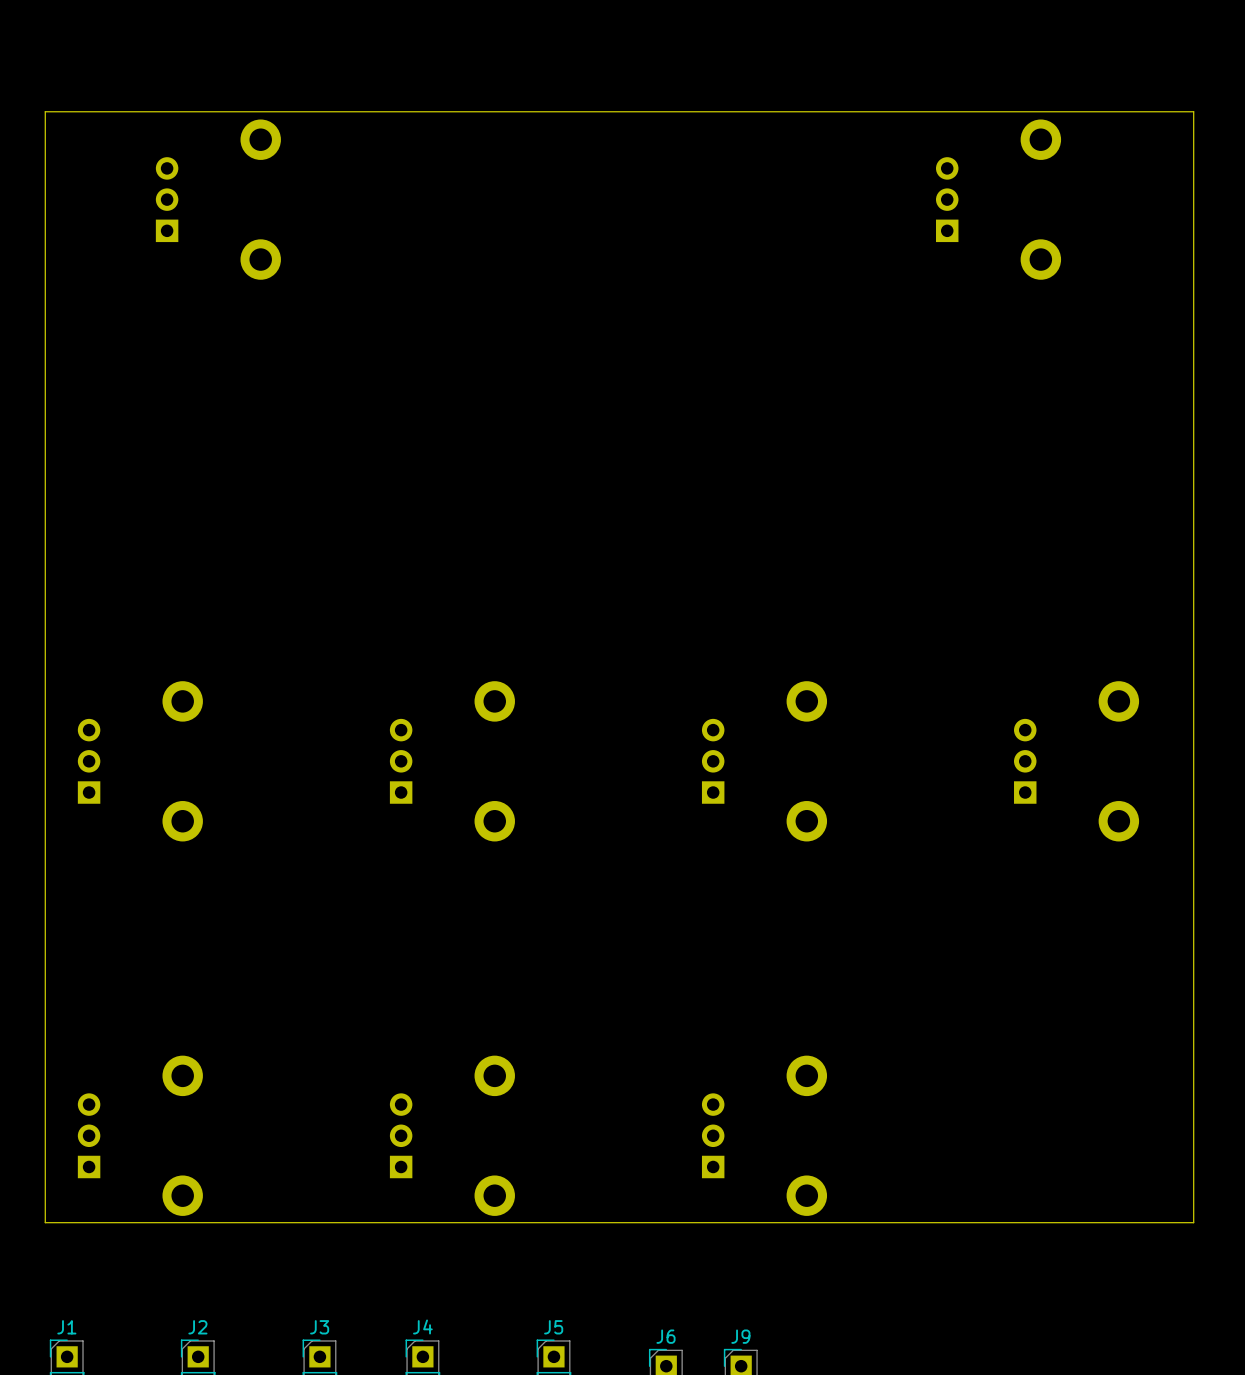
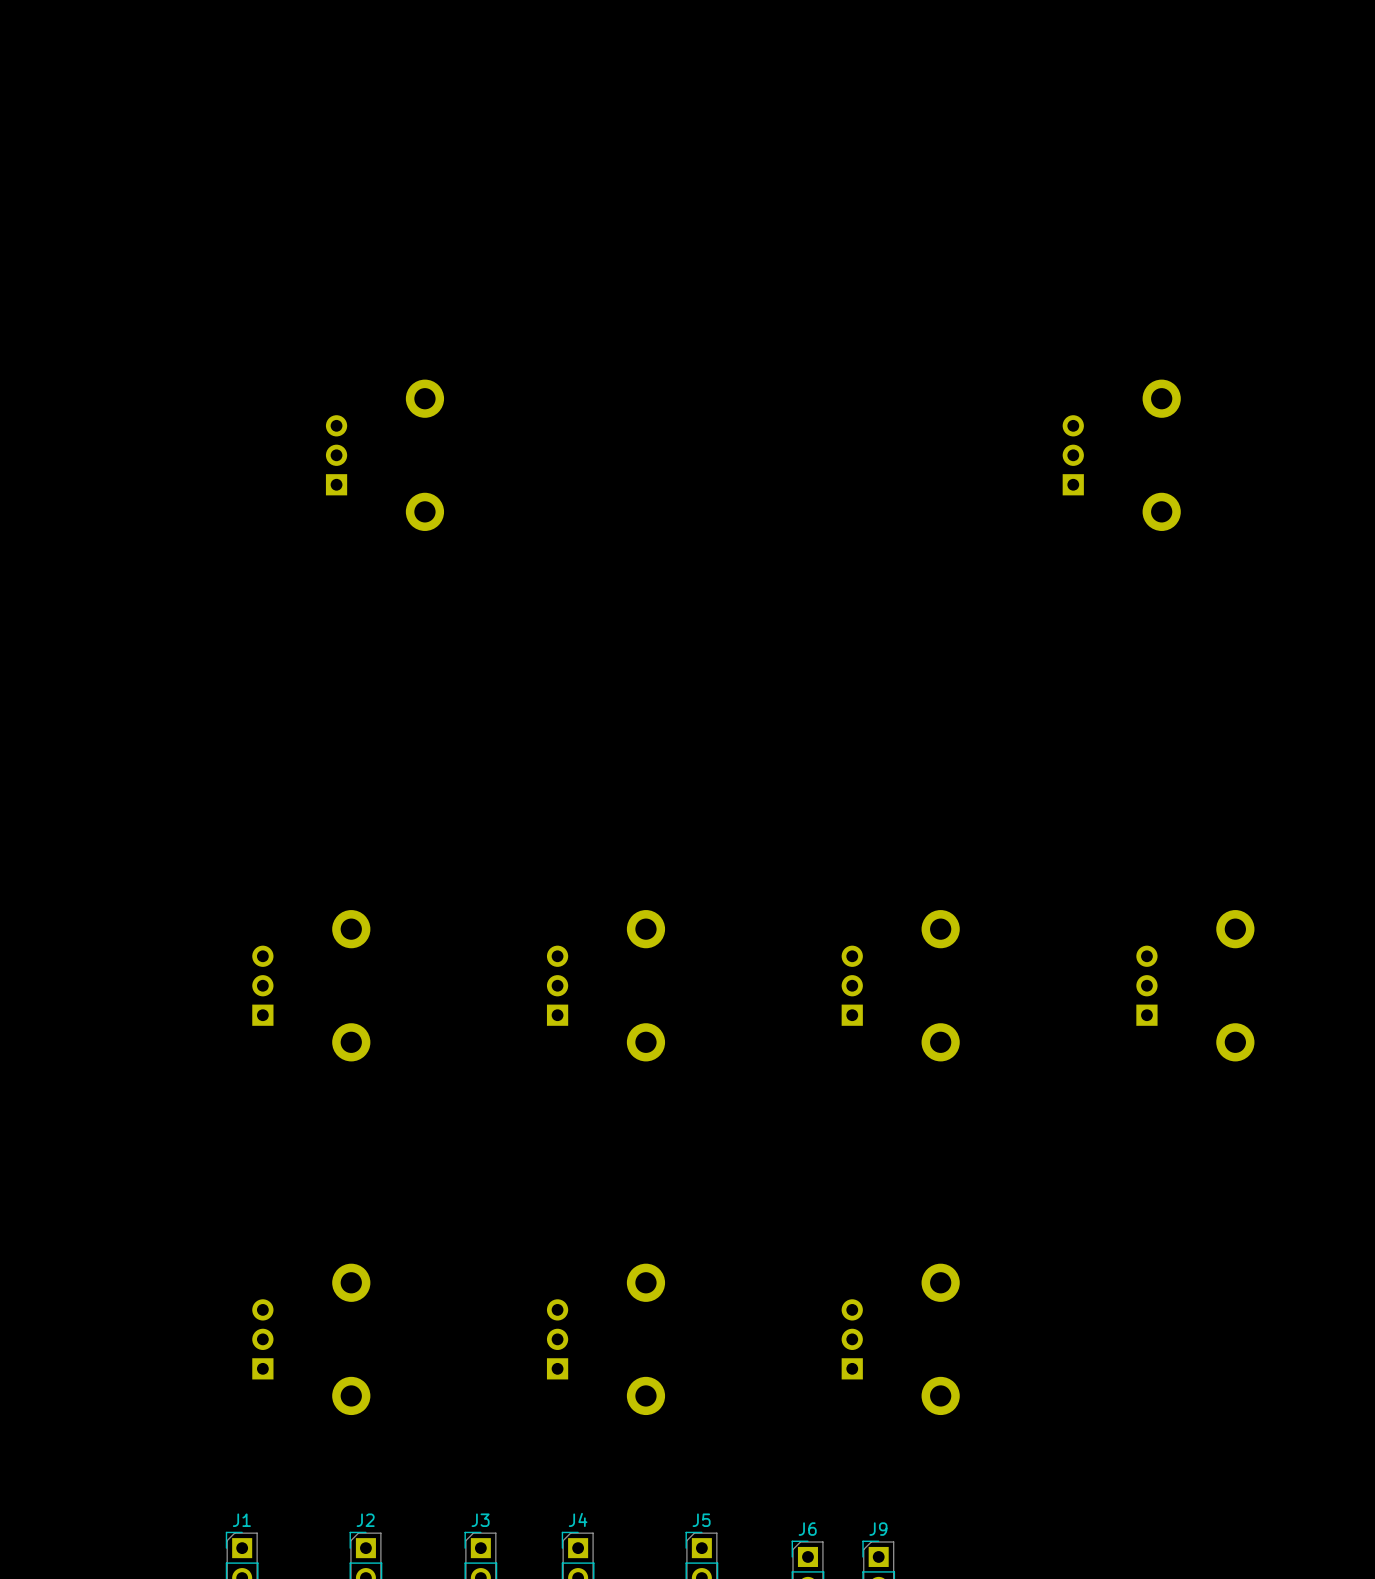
board edge: (45, 111) (1193, 111) (1193, 1222) (45, 1222) (45, 111) -> none

